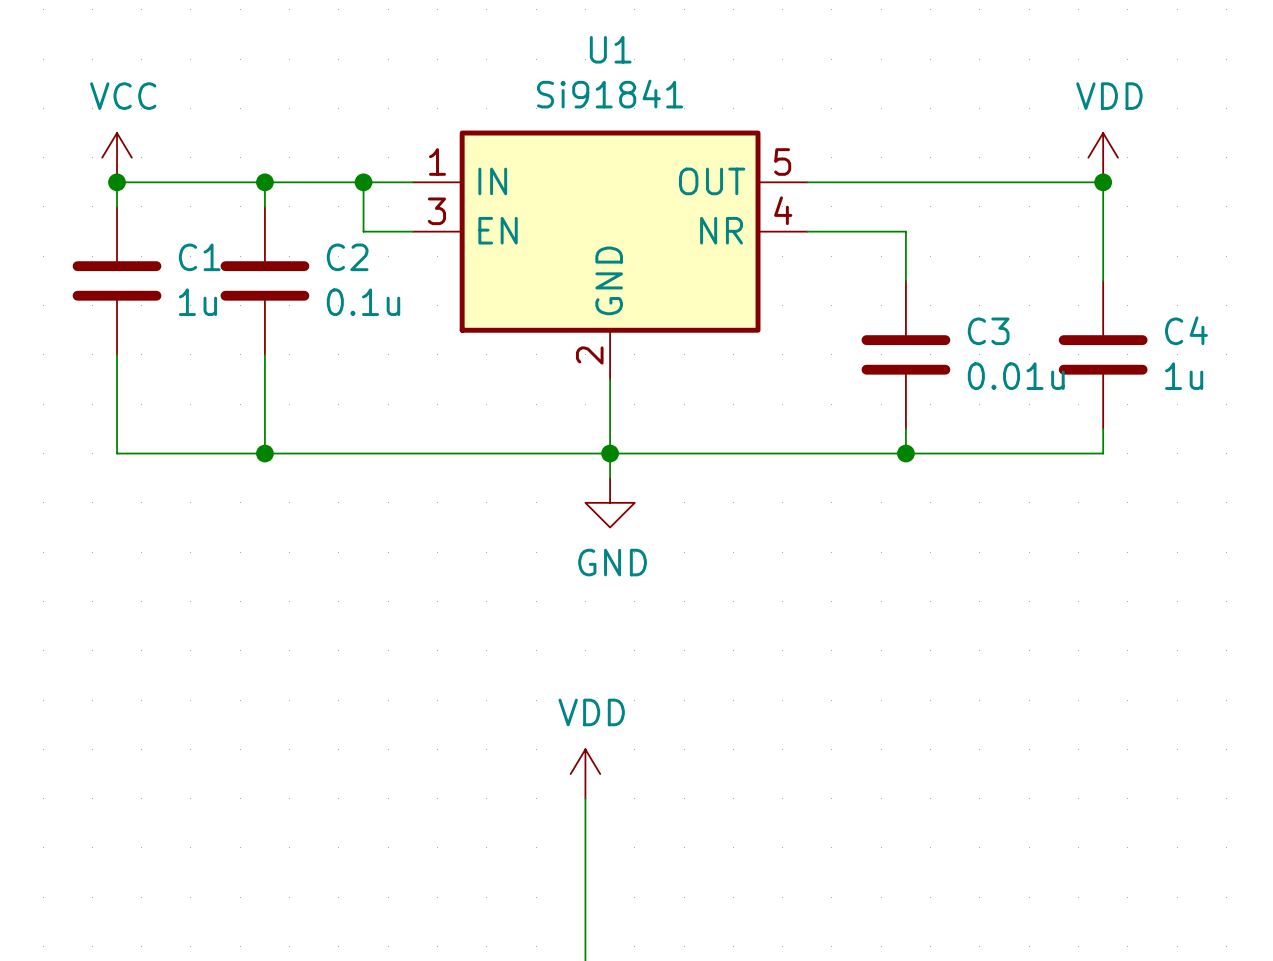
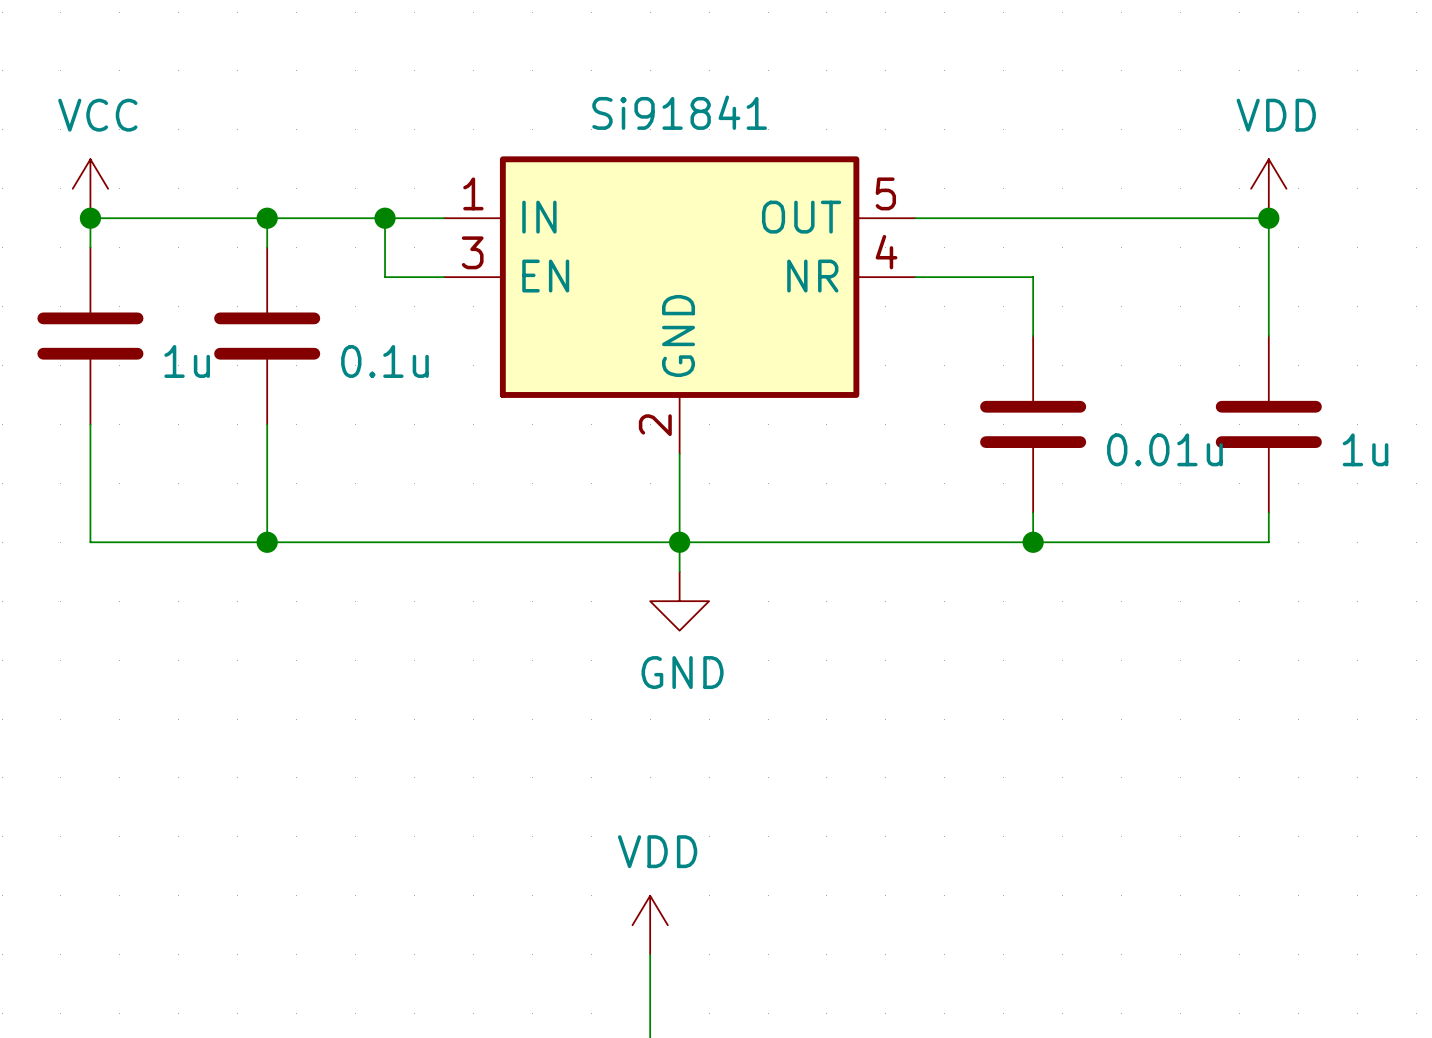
U1 name: U1 (610, 49) -> none
C1 name: C1 (199, 257) -> none
C2 name: C2 (347, 257) -> none
C4 name: C4 (1186, 330) -> none
C3 name: C3 (988, 331) -> none

